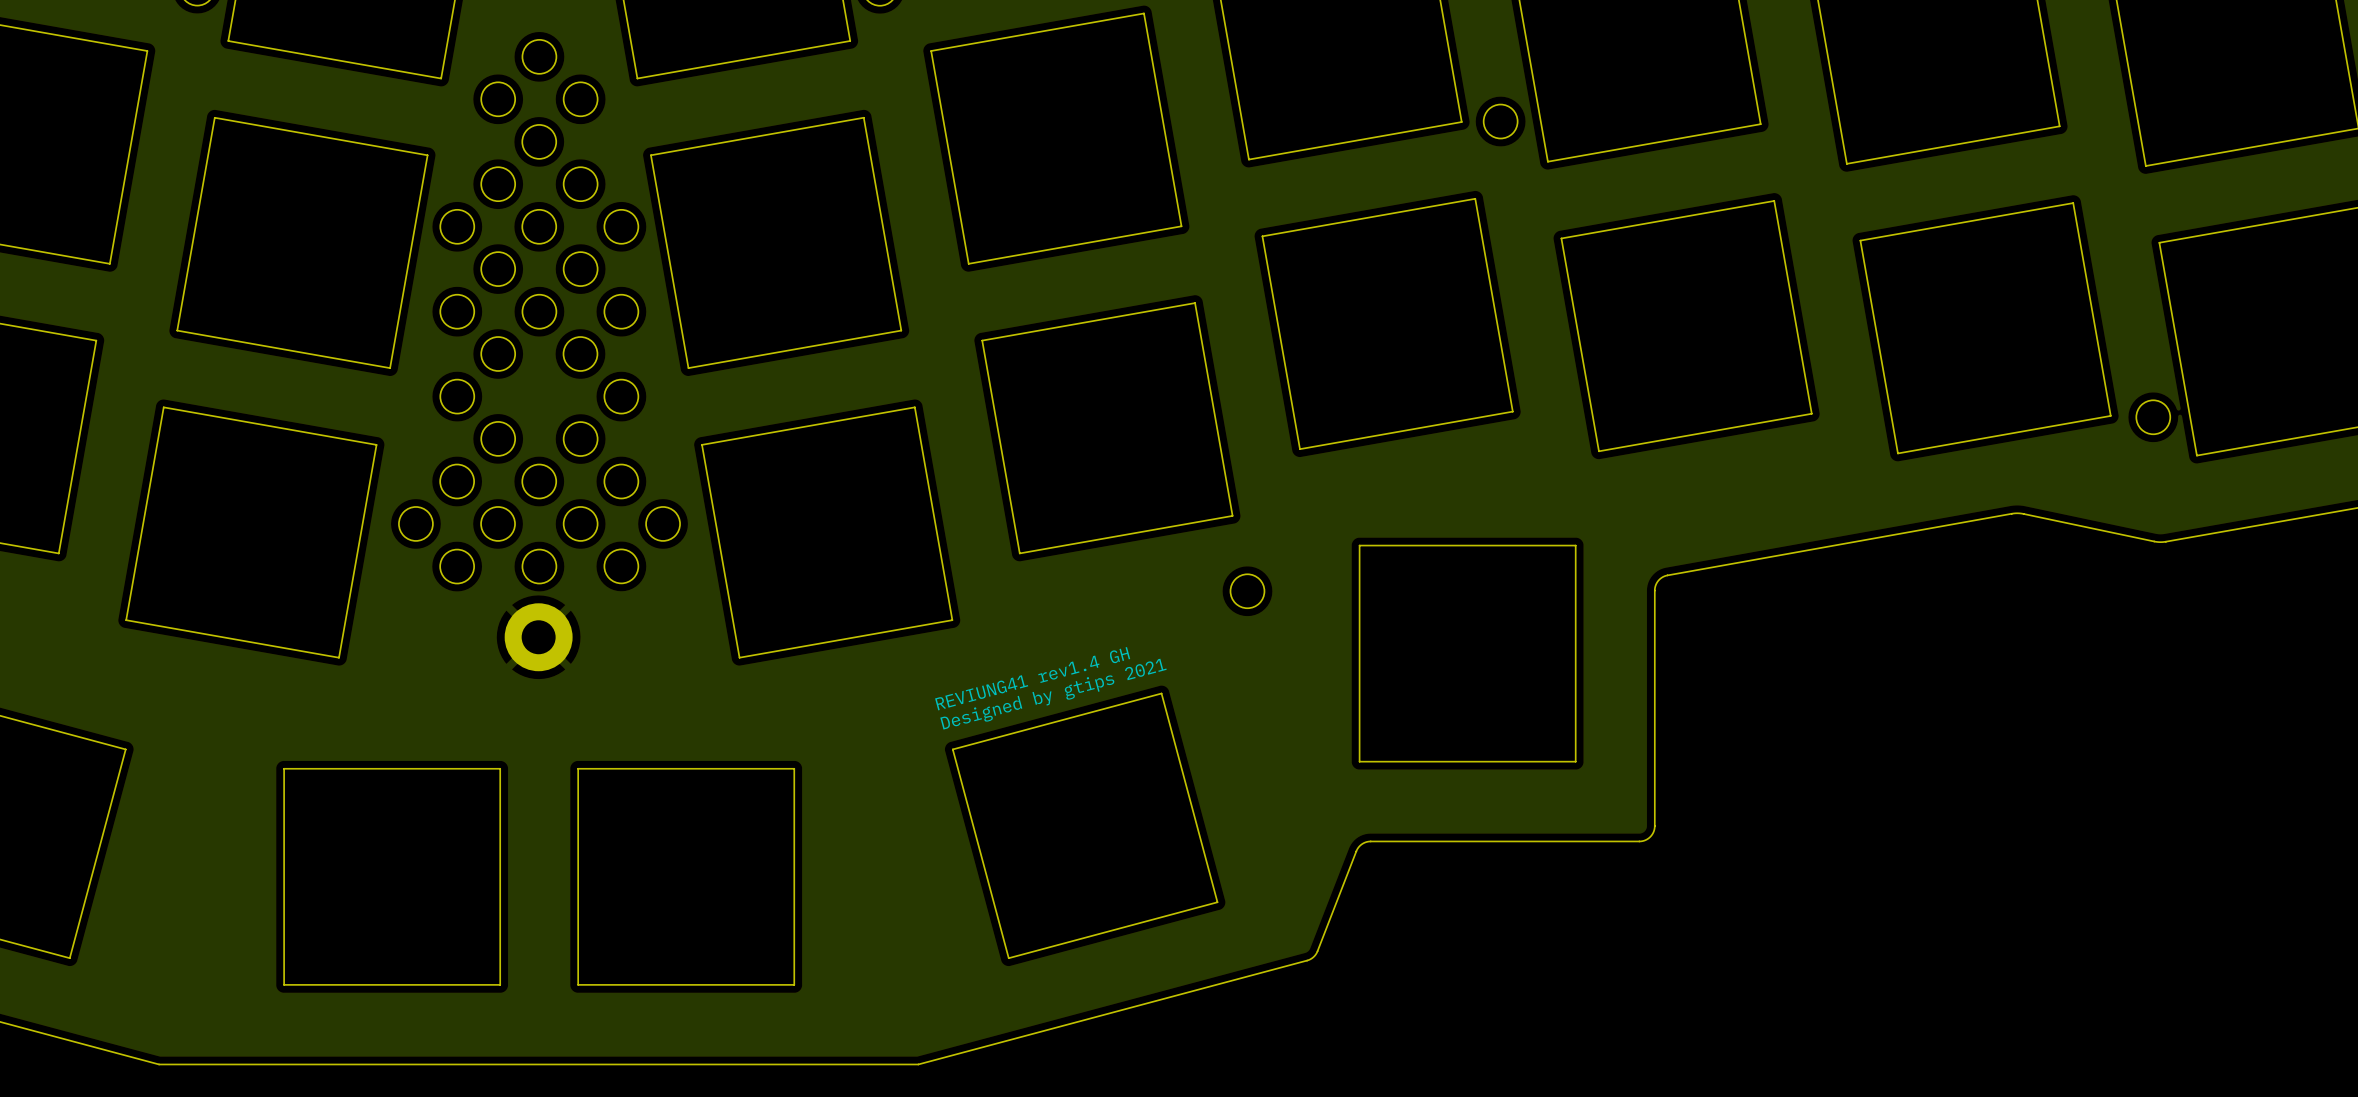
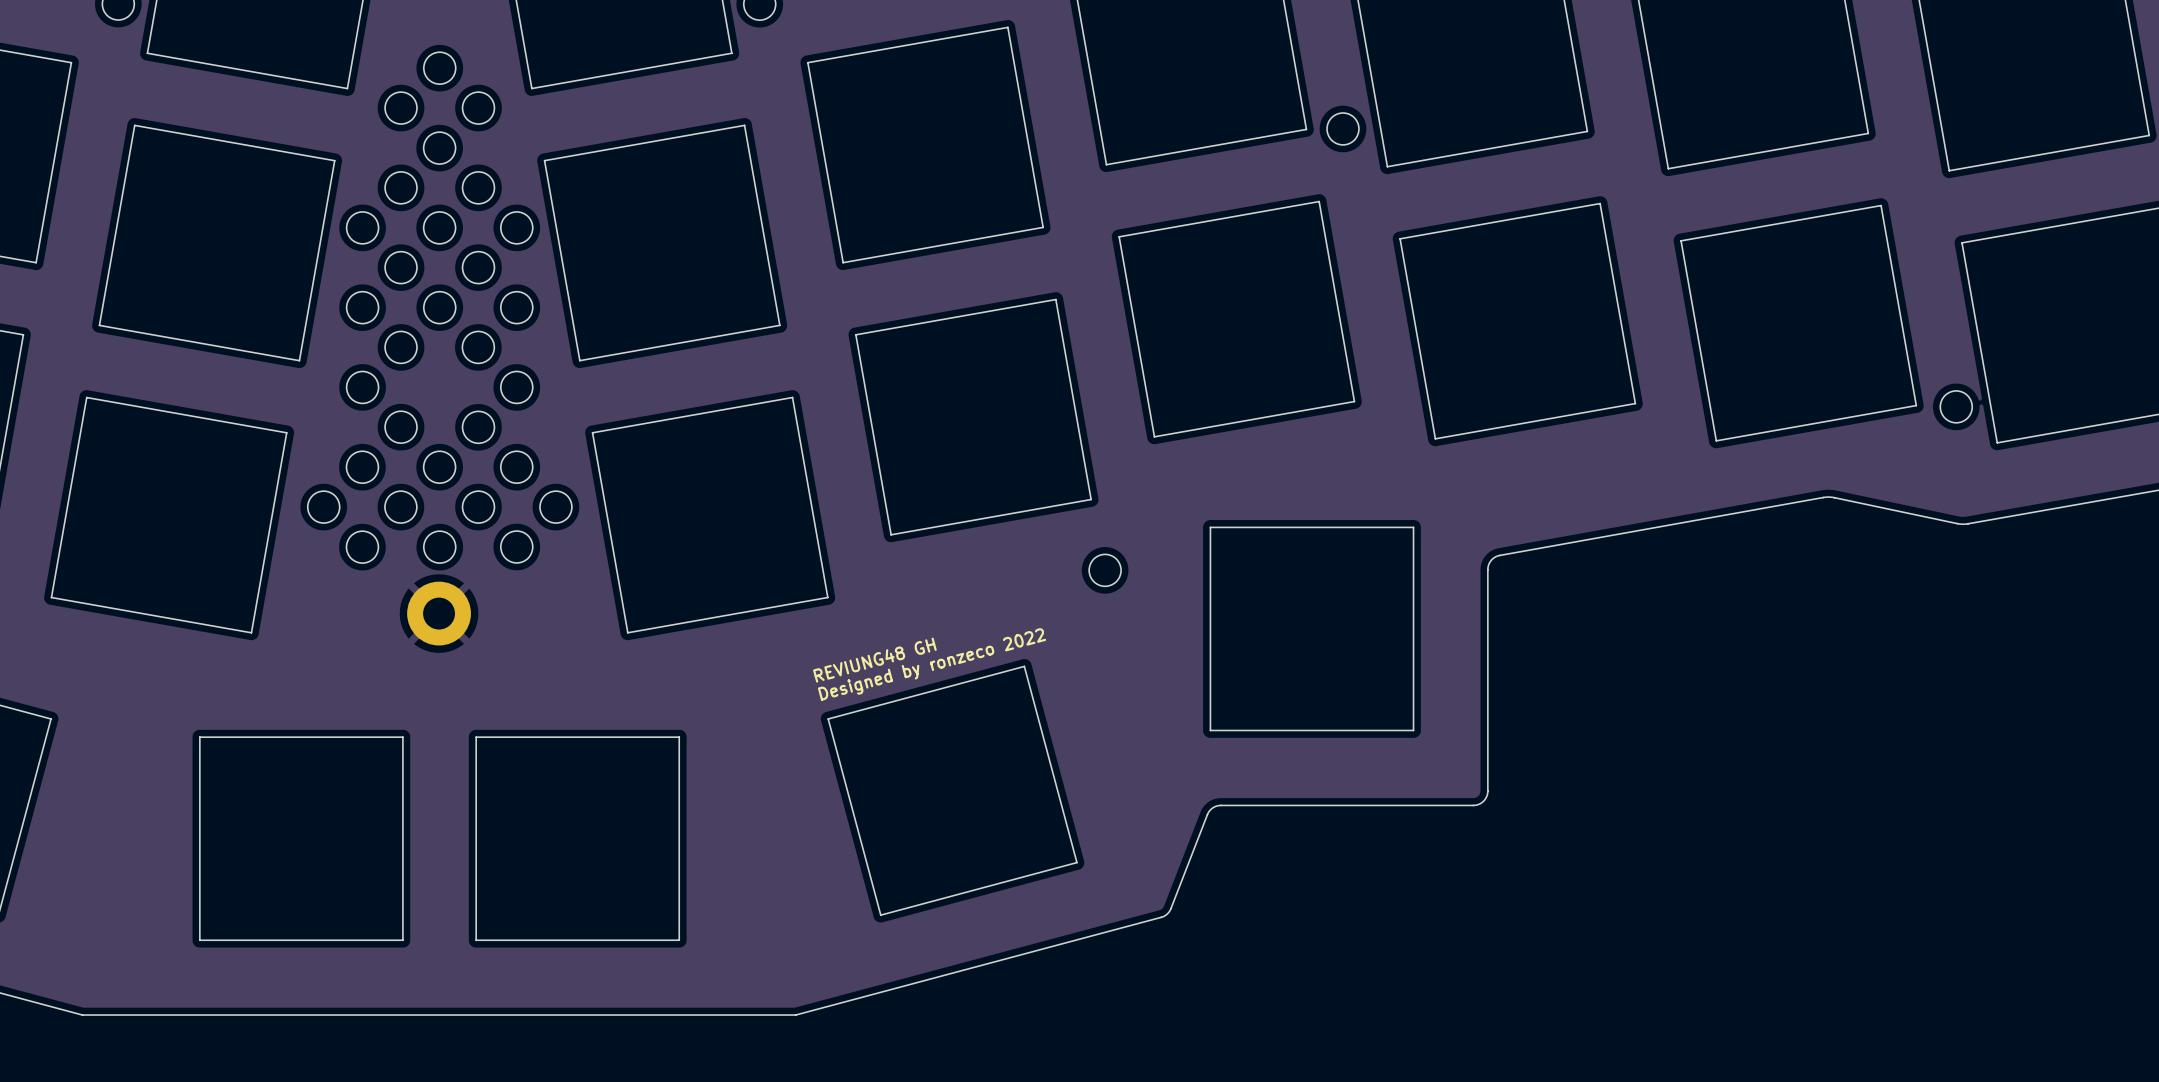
text: REVIUNG41 rev1.4 GH (1032, 678) -> REVIUNG48 GH (874, 660)
text: Designed by gtips 2021 (1053, 694) -> Designed by ronzeco 2022 (932, 664)

